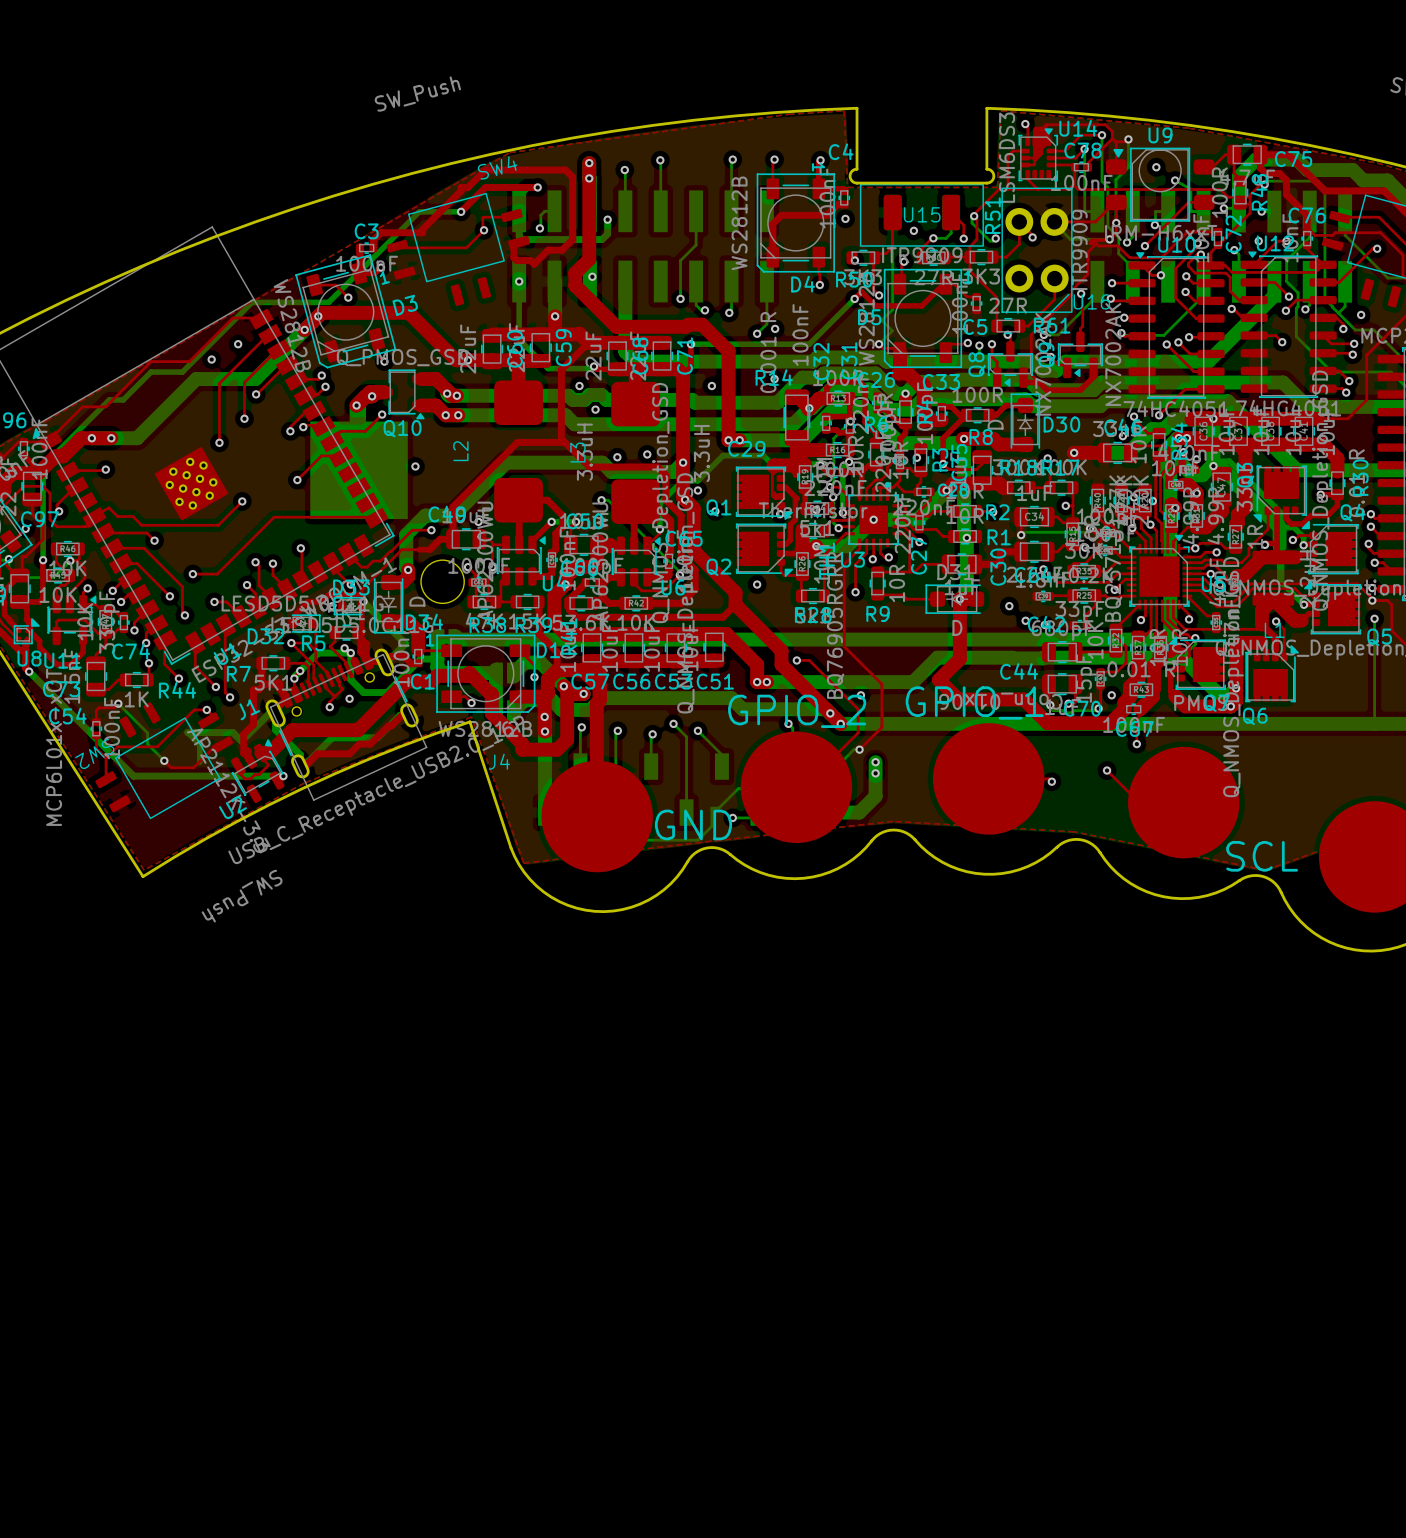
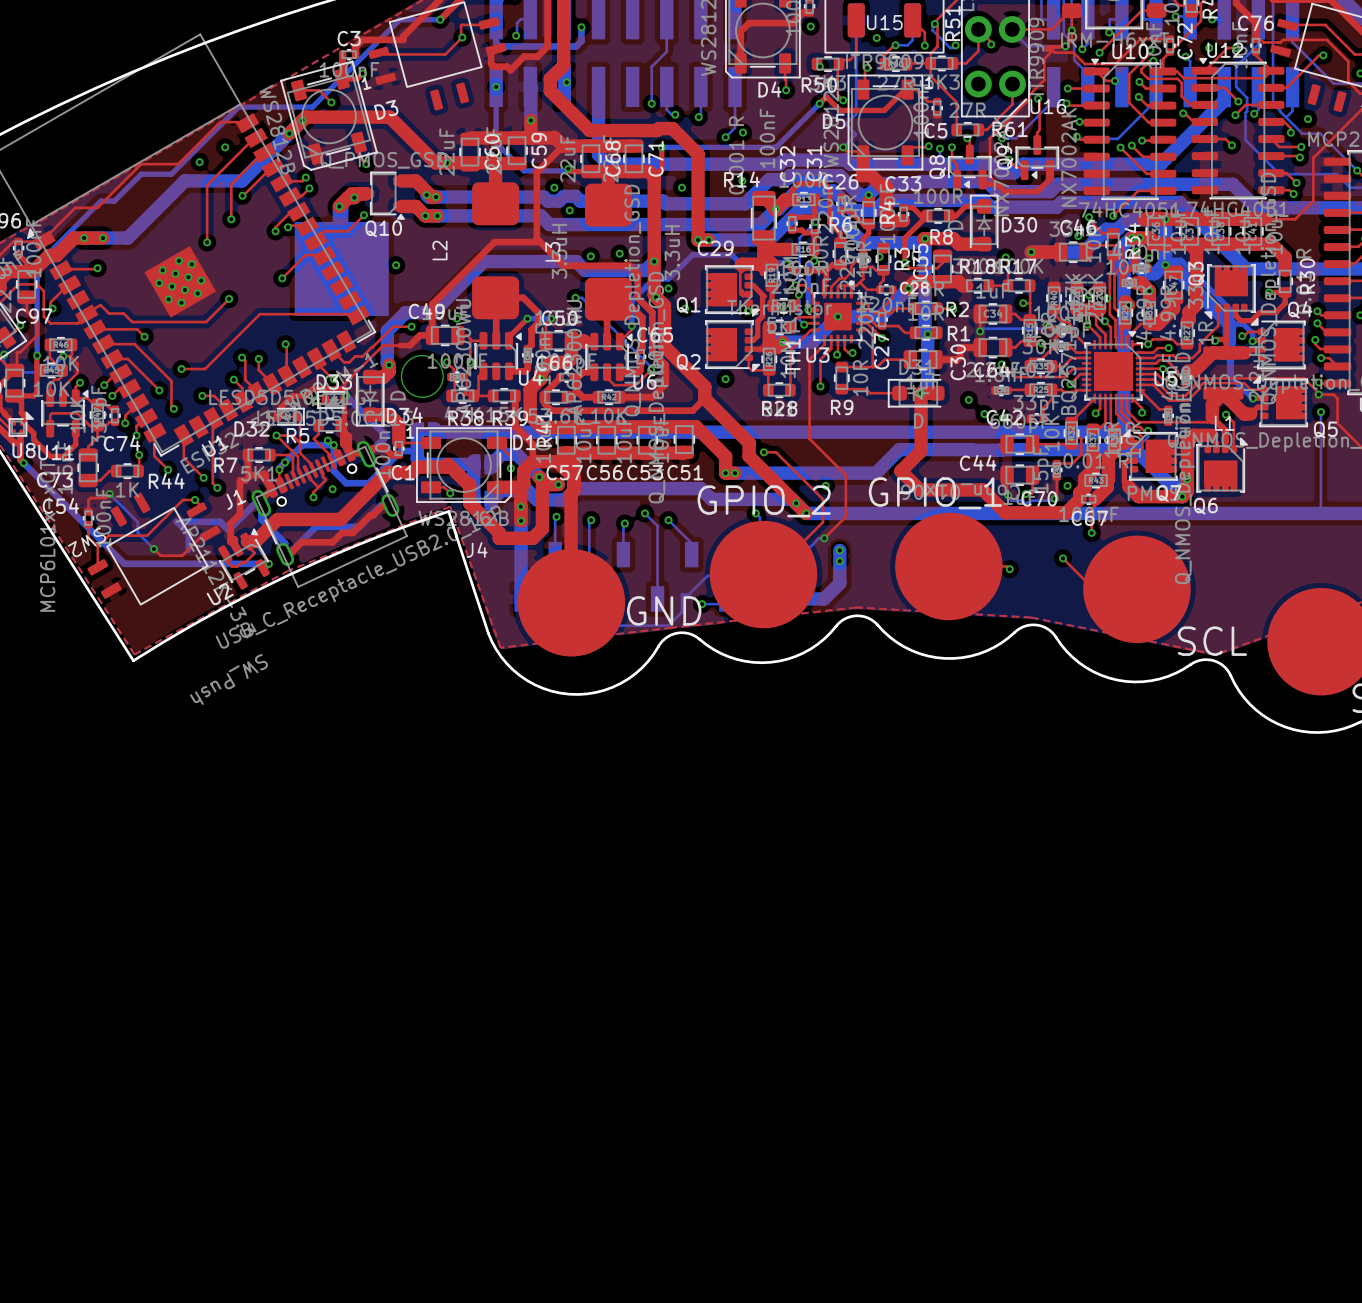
U3 value: BQ76905RGRR (835, 625) -> none

